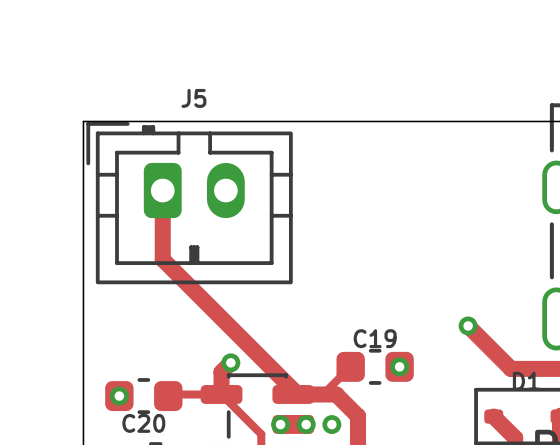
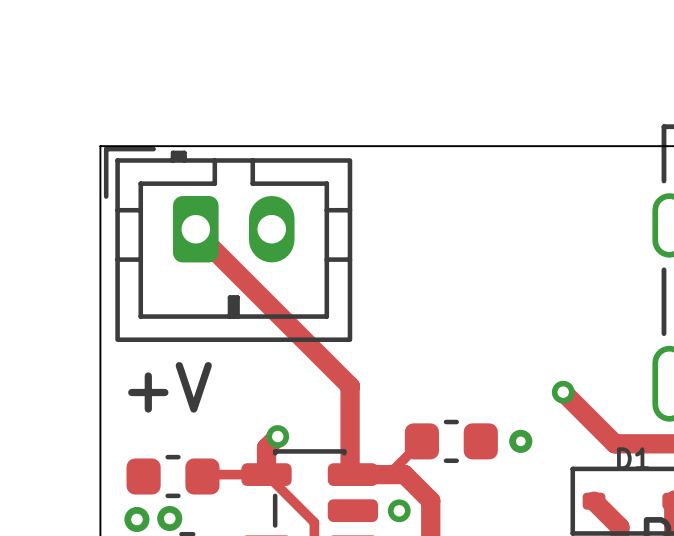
J5 name: J5 (193, 98) -> none
track: (162, 190) (162, 259) (293, 390) (293, 394) -> (197, 234) (350, 386) (350, 471) (352, 474)
text: none -> +V (170, 387)
C19 name: C19 (375, 338) -> none
via: (399, 366) -> none
via: none -> (520, 441)
via: (119, 396) -> none
C20 name: C20 (143, 423) -> none
via: (280, 424) -> none
via: (306, 424) -> none
via: none -> (169, 518)
via: none -> (136, 519)

